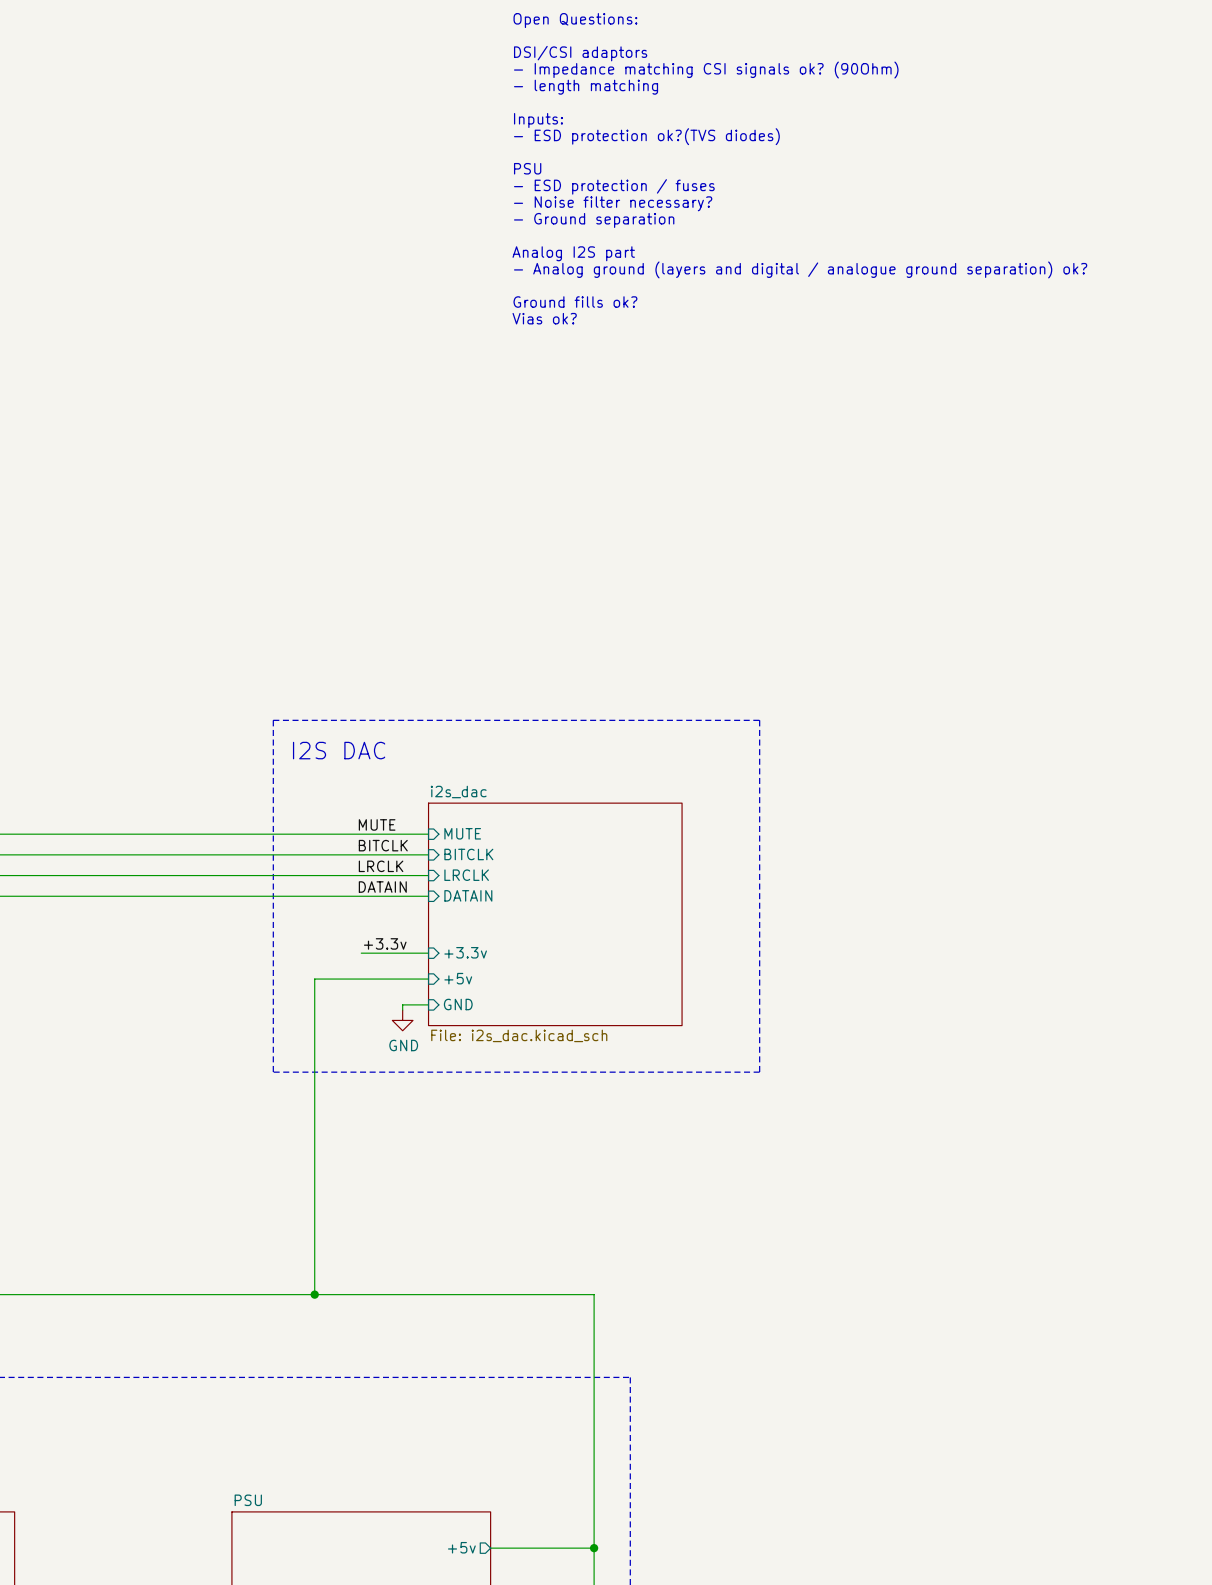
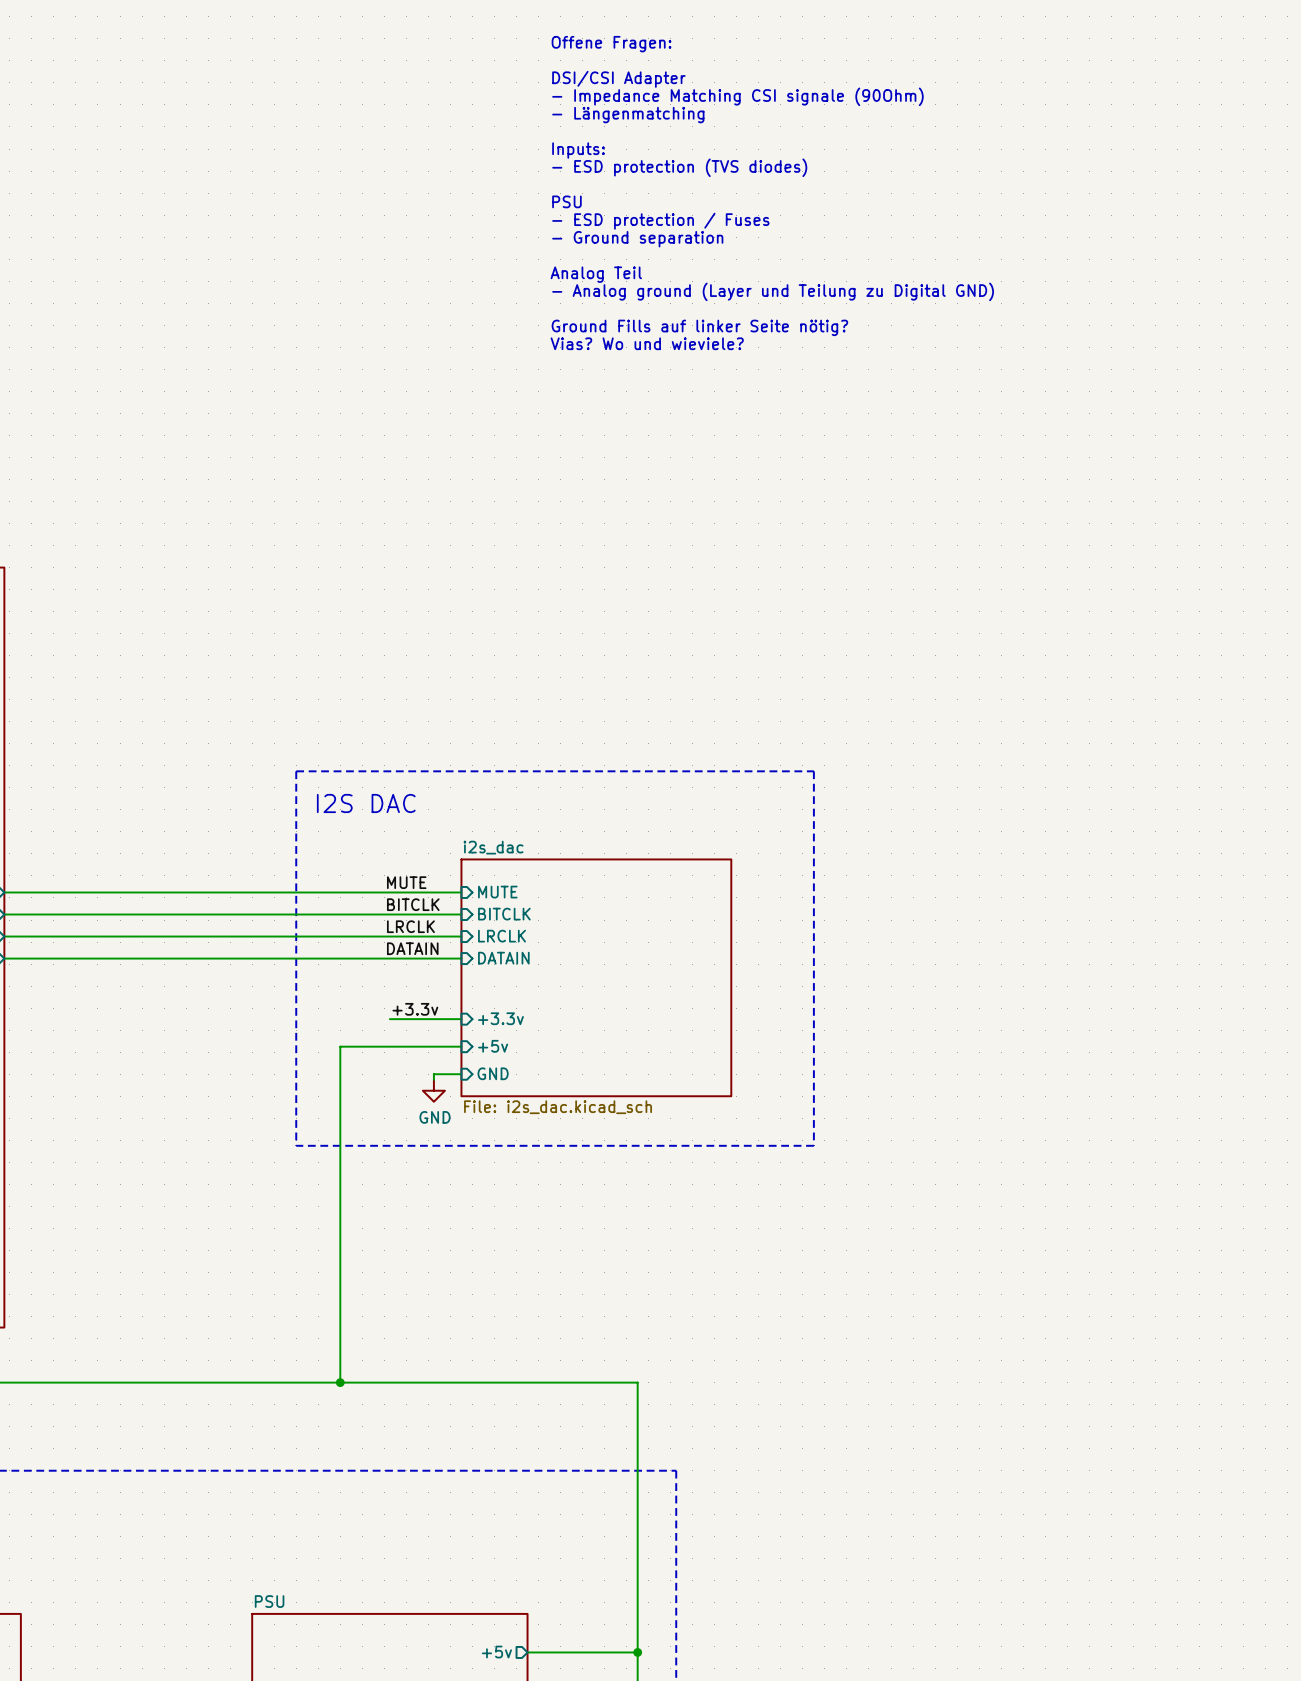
text: Open Questions: (575, 20) -> none
text: none -> Offene Fragen: (611, 44)
text: DSI/CSI adaptors (580, 53) -> none
text: - Impedance matching CSI signals ok? (90Ohm) (706, 70) -> DSI/CSI Adapter (618, 79)
text: - length matching (586, 87) -> - Impedance Matching CSI signale (90Ohm) (737, 96)
text: none -> - Längenmatching (628, 115)
text: Inputs: (538, 120) -> none
text: - ESD protection ok?(TVS diodes) (646, 136) -> Inputs: (578, 150)
text: none -> - ESD protection (TVS diodes) (679, 167)
text: PSU (527, 168) -> none
text: - ESD protection / fuses (614, 186) -> PSU (566, 201)
text: - Noise filter necessary? (613, 203) -> - ESD protection / Fuses (660, 221)
text: Analog I2S part (573, 253) -> Analog Teil (596, 274)
text: - Analog ground (layers and digital / analogue ground separation) ok? (800, 269) -> - Analog ground (Layer und Teilung zu Digital GND) (773, 291)
text: Ground fills ok? (575, 302) -> Ground Fills auf linker Seite nötig? (699, 327)
text: Vias ok? (544, 318) -> Vias? Wo und wieviele? (647, 343)

